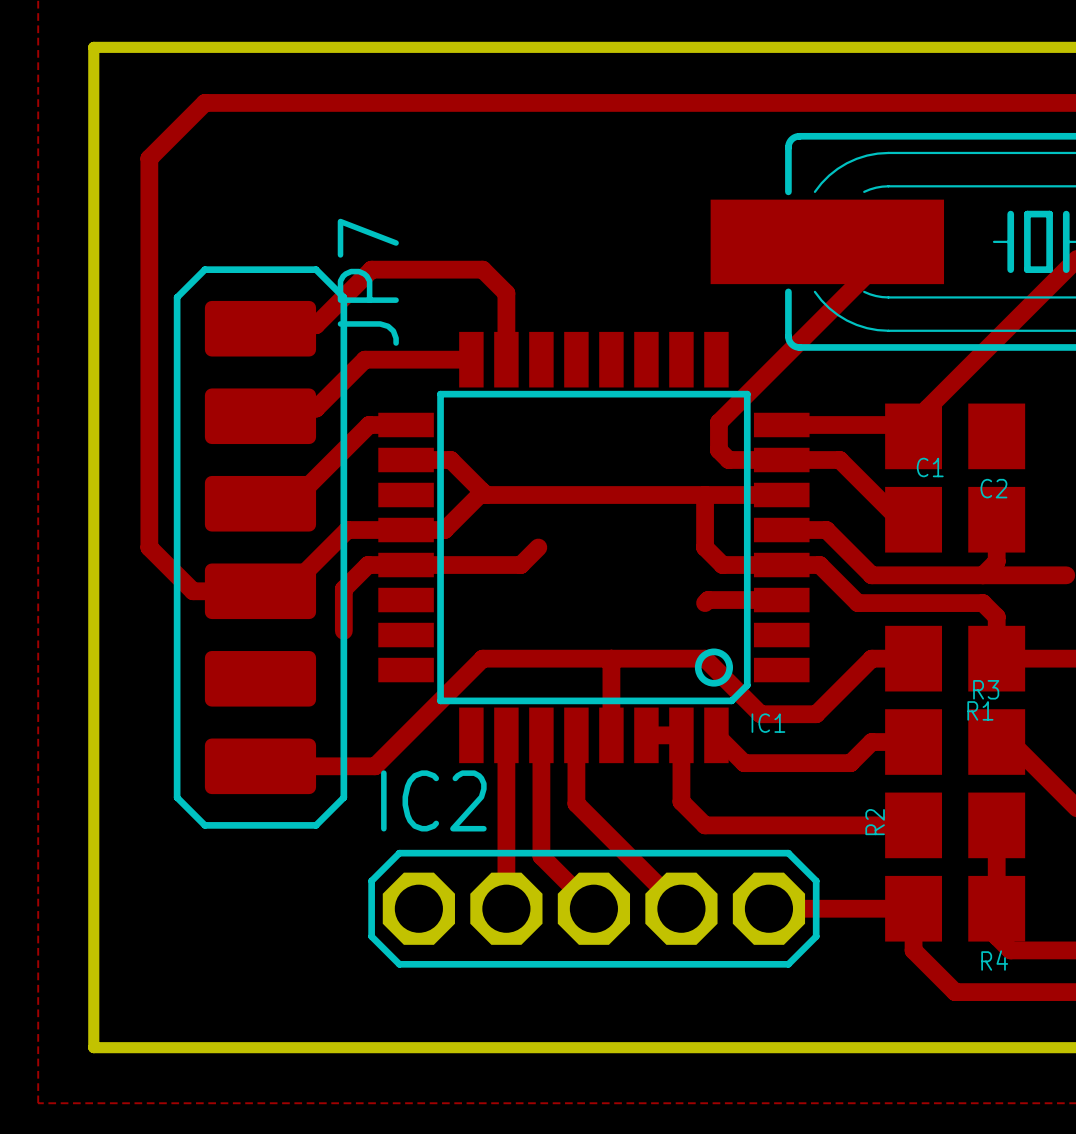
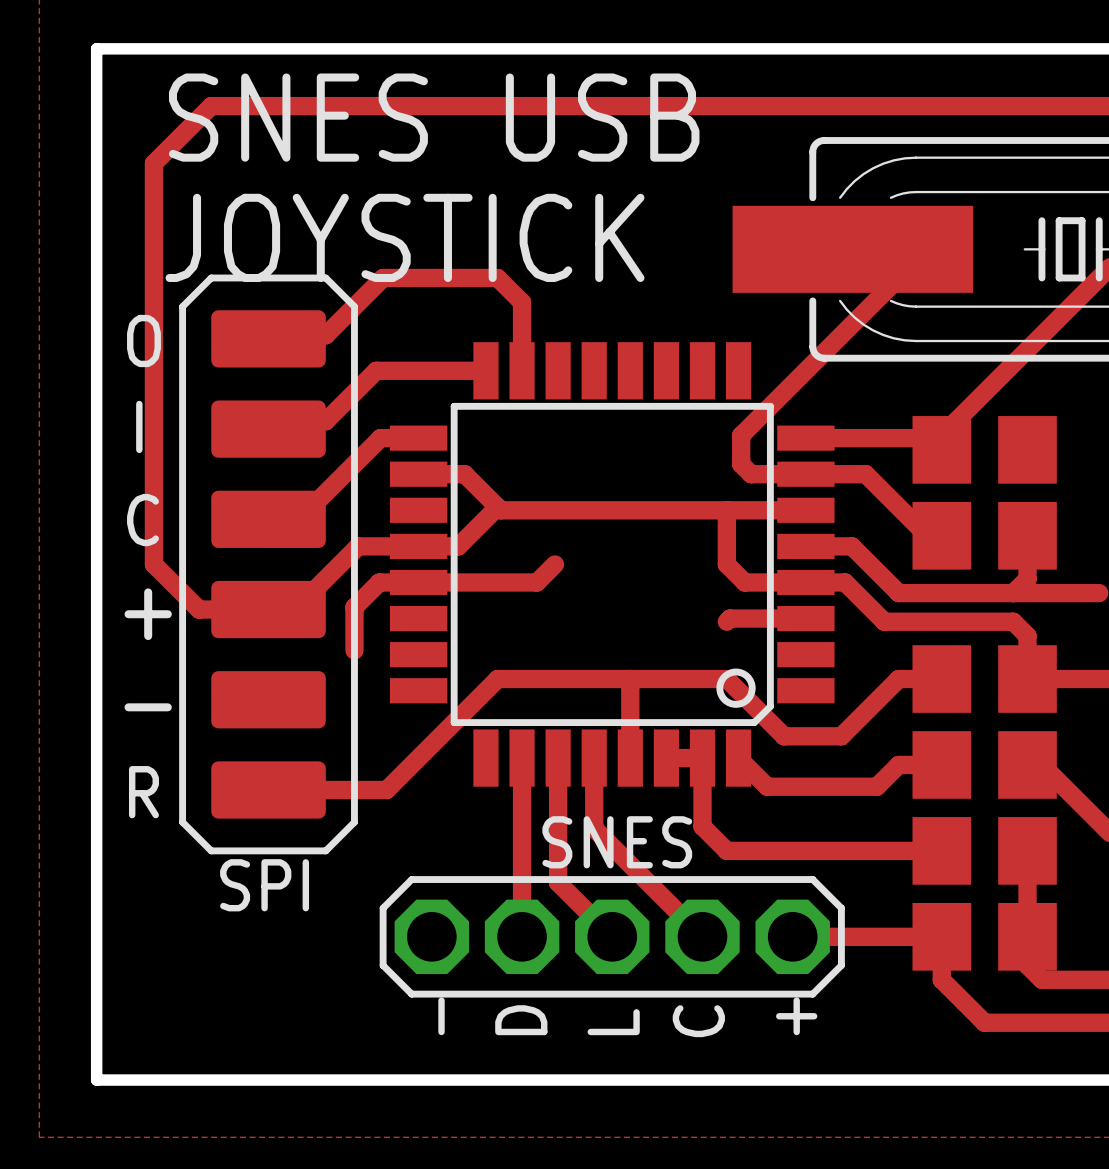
text: none -> SNES USB (434, 117)
text: none -> JOYSTICK (405, 237)
JP7 name: JP7 (368, 282) -> none
text: none -> O (143, 341)
text: none -> I (139, 426)
C1 name: C1 (930, 467) -> none
C2 name: C2 (993, 488) -> none
text: none -> C (142, 520)
text: none -> + (148, 614)
text: none -> - (148, 707)
R3 name: R3 (986, 689) -> none
R1 name: R1 (980, 710) -> none
IC1 name: IC1 (768, 723) -> none
text: none -> R (143, 792)
IC2 name: IC2 (433, 800) -> none
text: none -> SNES (617, 842)
R2 name: R2 (875, 822) -> none
text: none -> SPI (264, 885)
R4 name: R4 (994, 960) -> none
text: none -> - (441, 1016)
text: none -> + (796, 1016)
text: none -> D (521, 1020)
text: none -> C (698, 1021)
text: none -> L (613, 1022)

